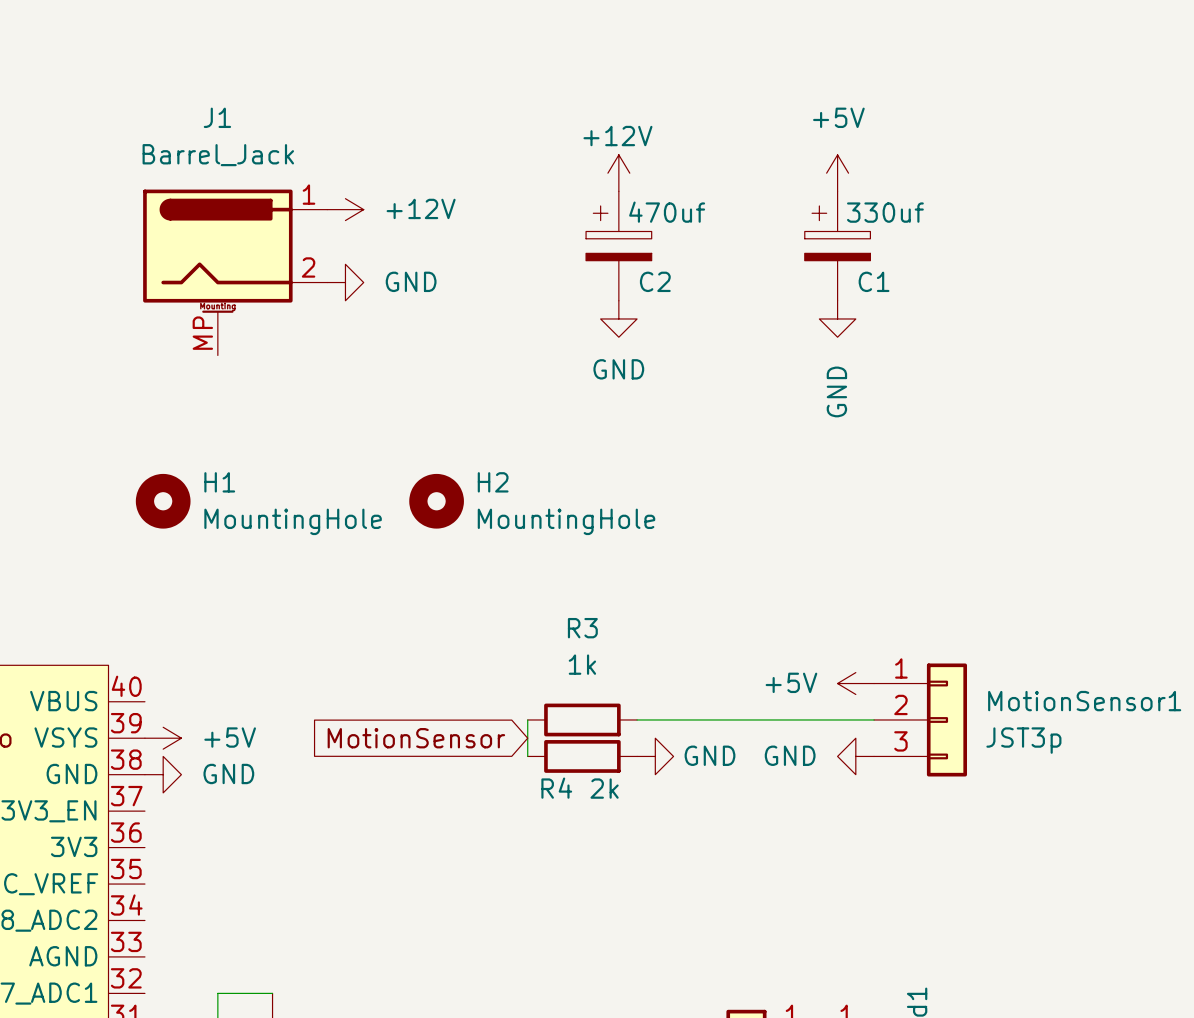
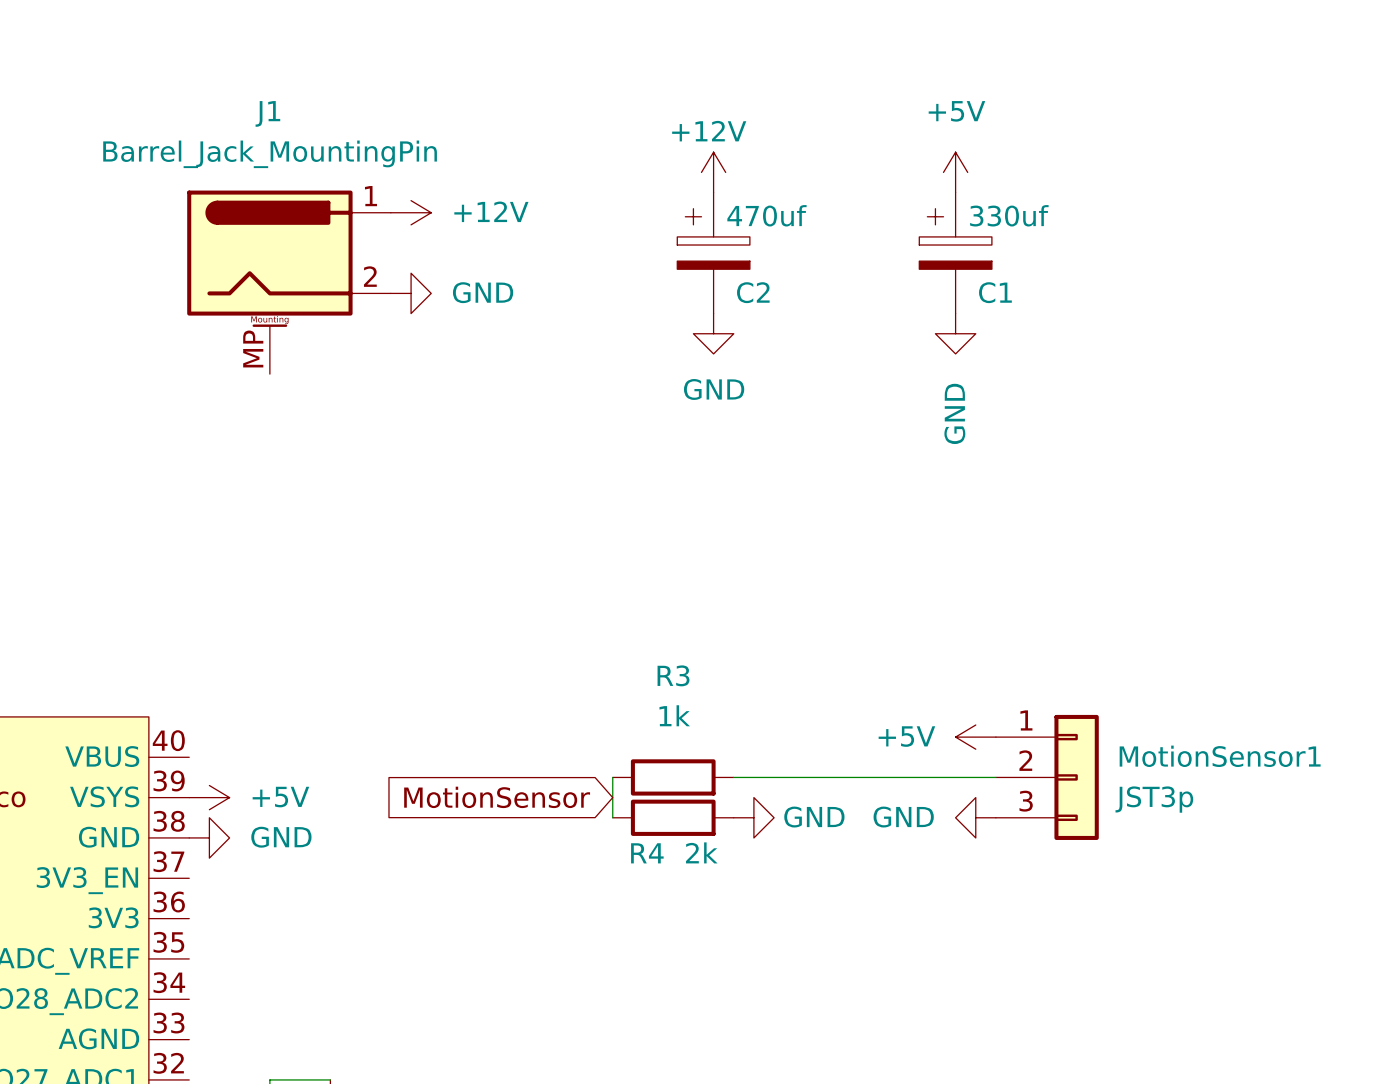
J1 value: Barrel_Jack (218, 155) -> Barrel_Jack_MountingPin (270, 154)
H1: MountingHole (163, 501) -> none
H2: MountingHole (436, 501) -> none

